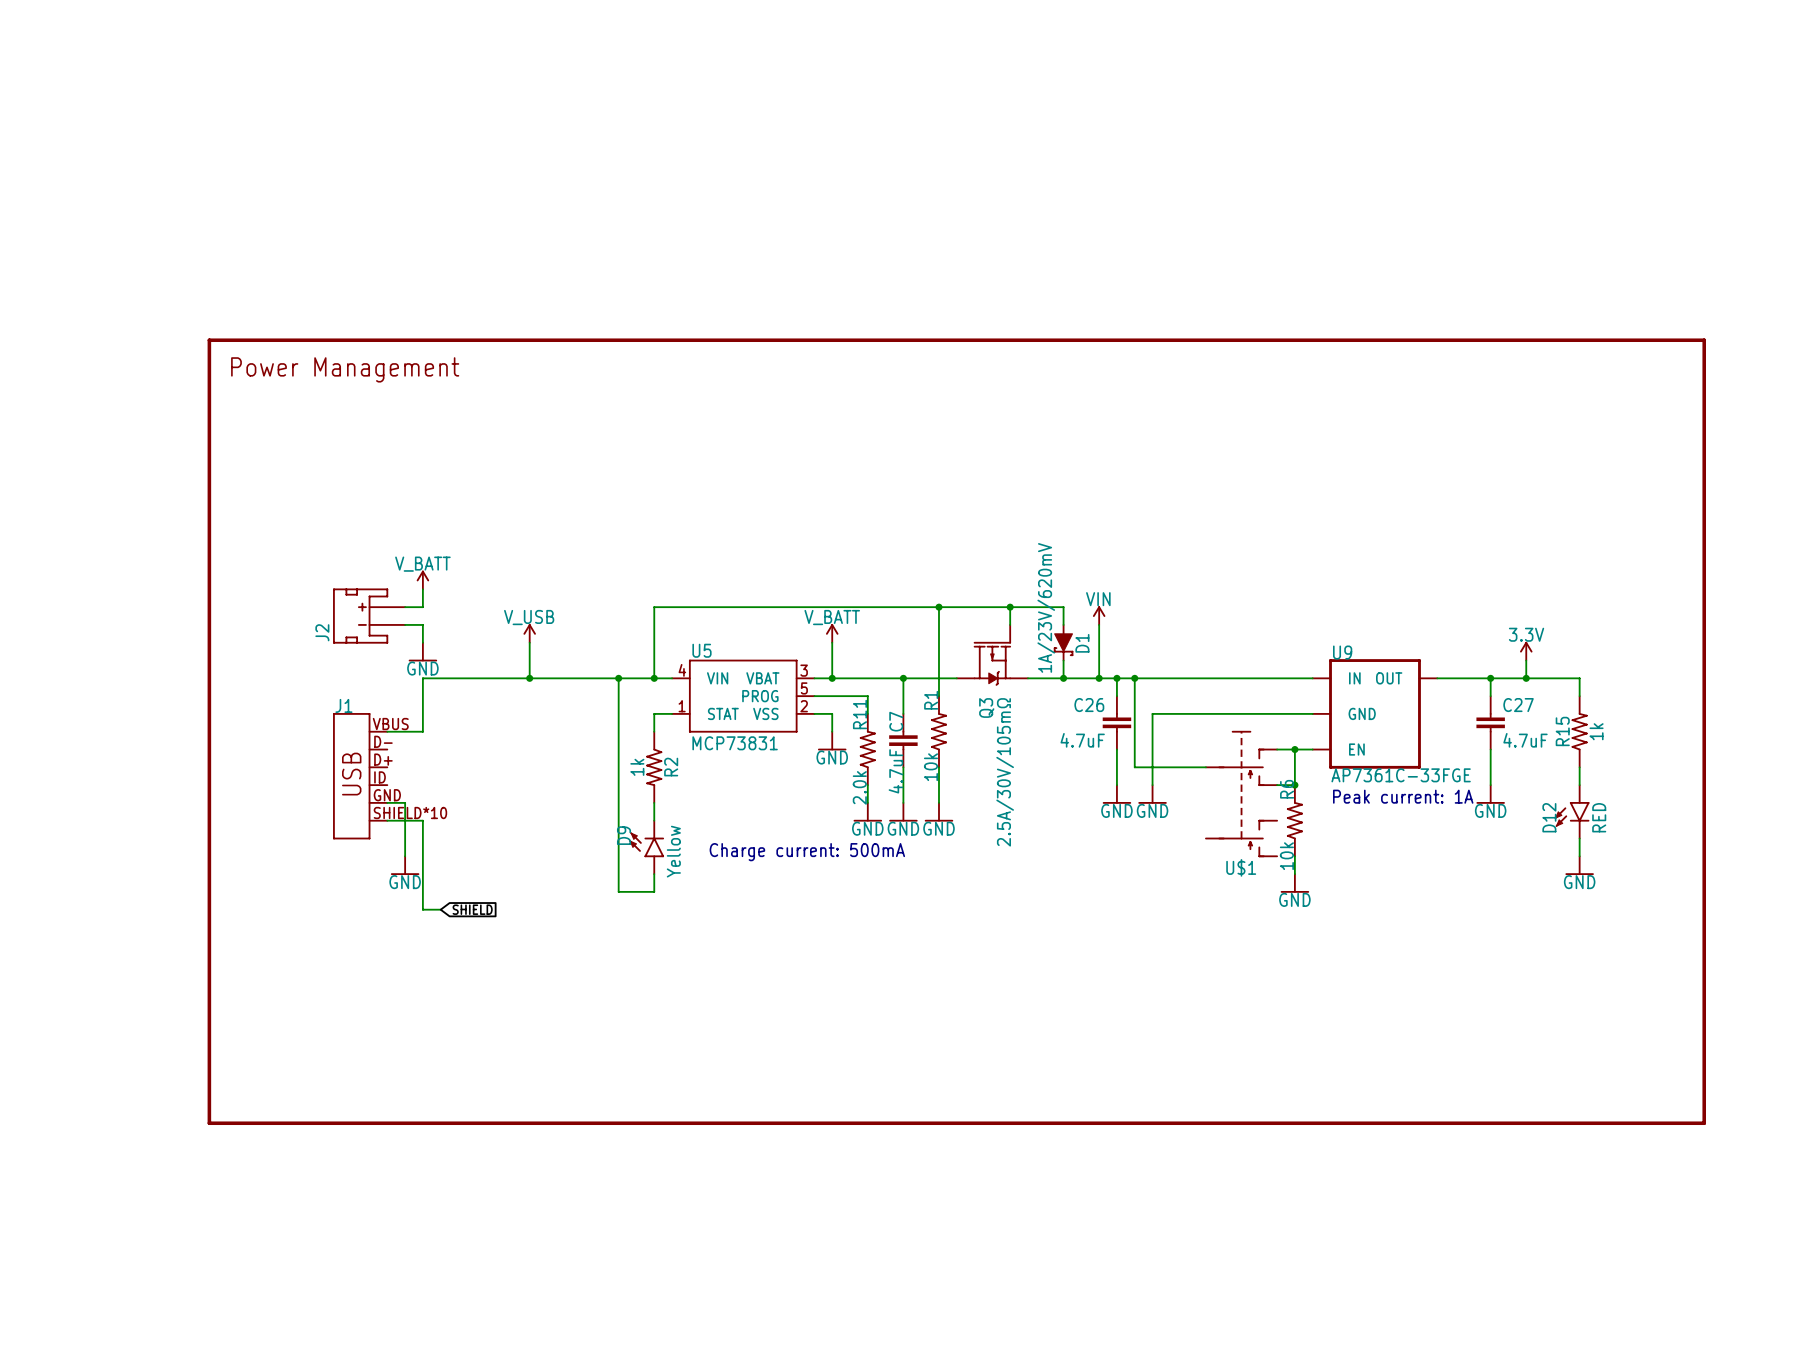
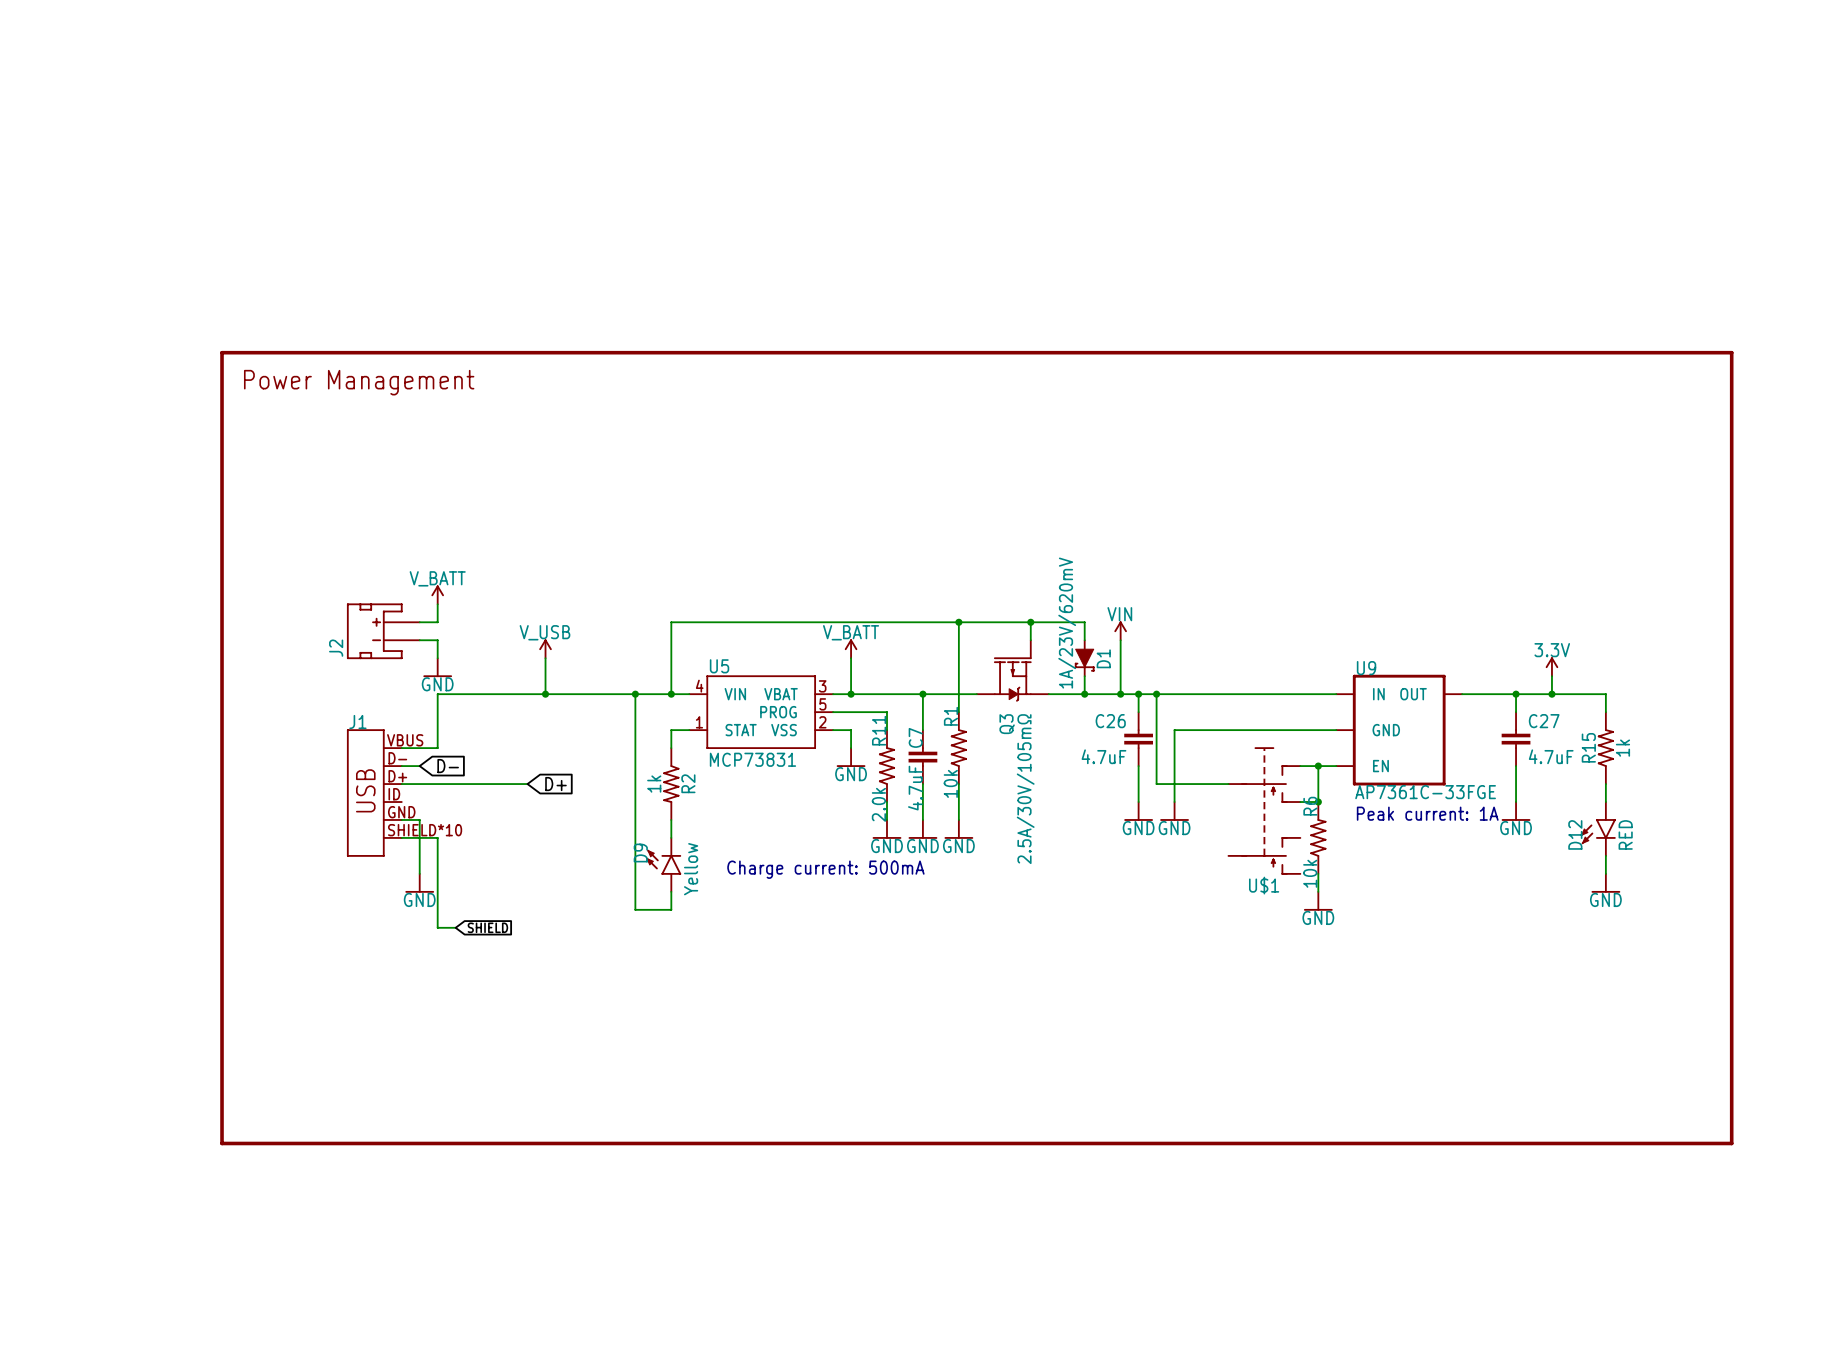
wire: none -> (401, 766) (419, 766)
global label: none -> D- (448, 766)
wire: none -> (401, 784) (527, 784)
global label: none -> D+ (555, 784)

